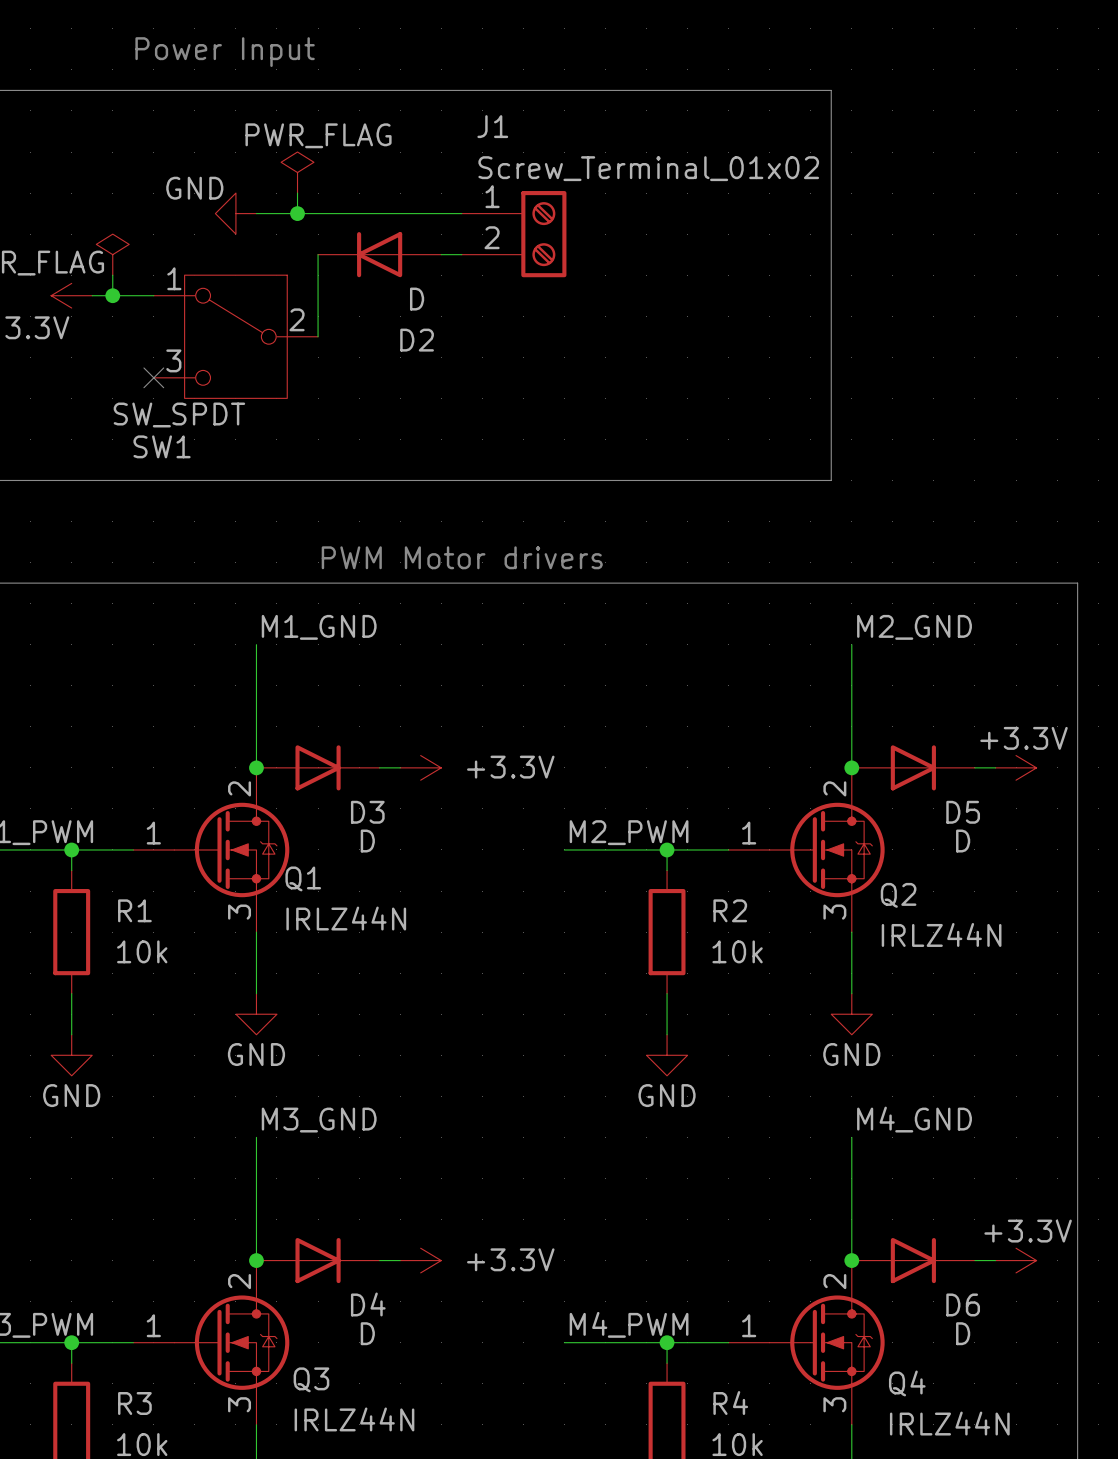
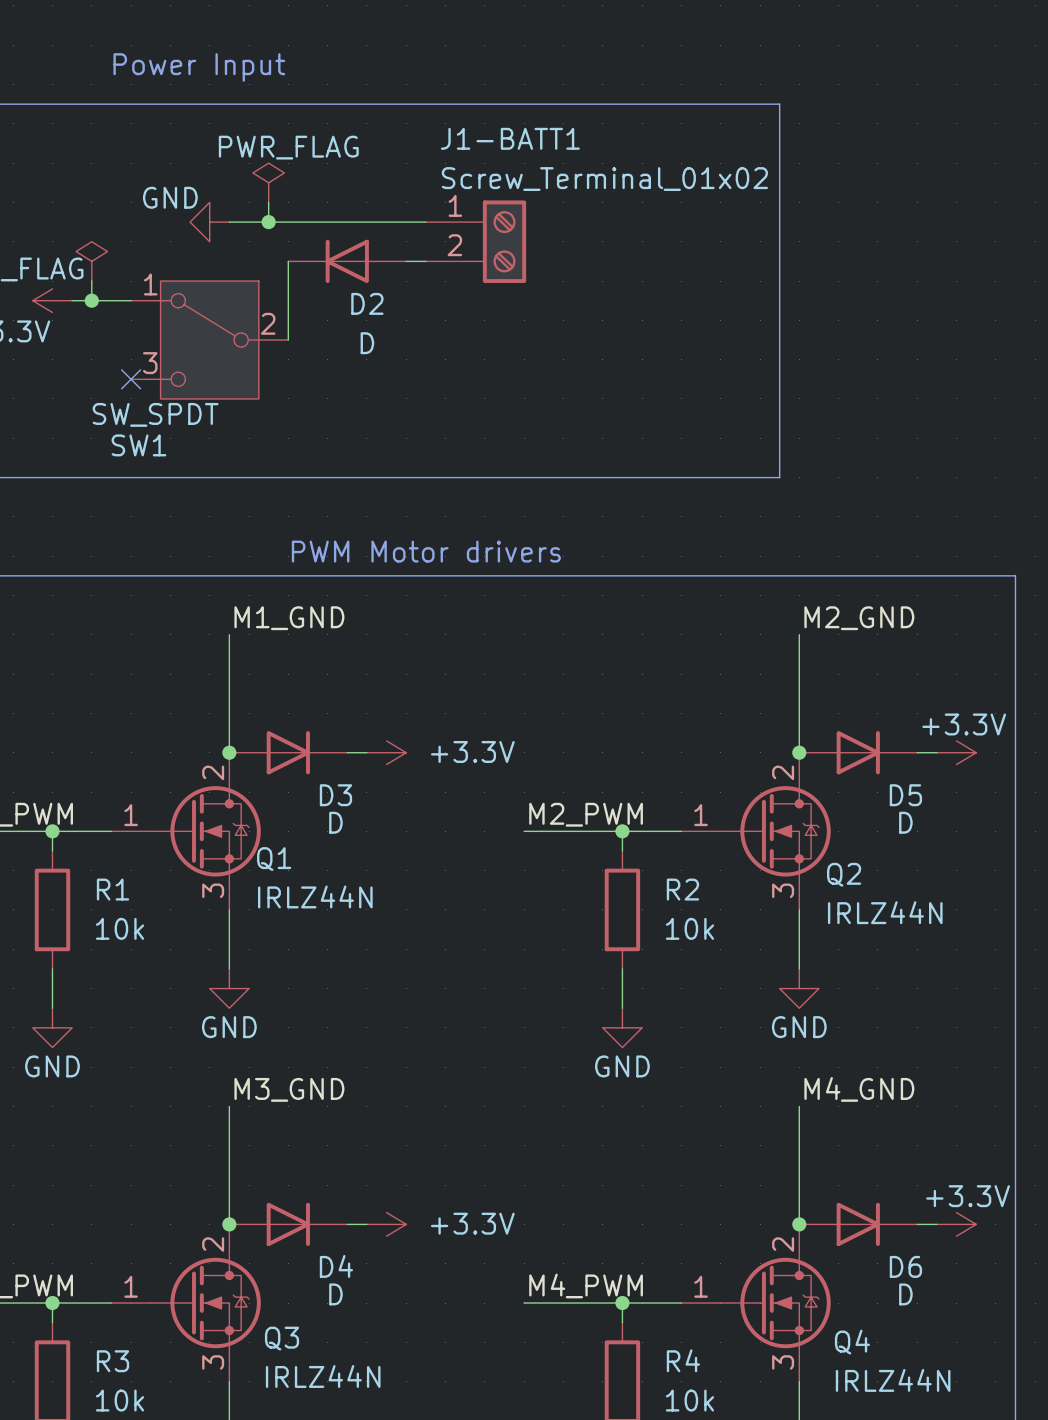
J1 name: J1 (492, 126) -> J1-BATT1 (510, 138)
D2 value position: D (417, 299) -> D (367, 343)
D2 name position: D2 (417, 340) -> D2 (367, 303)

